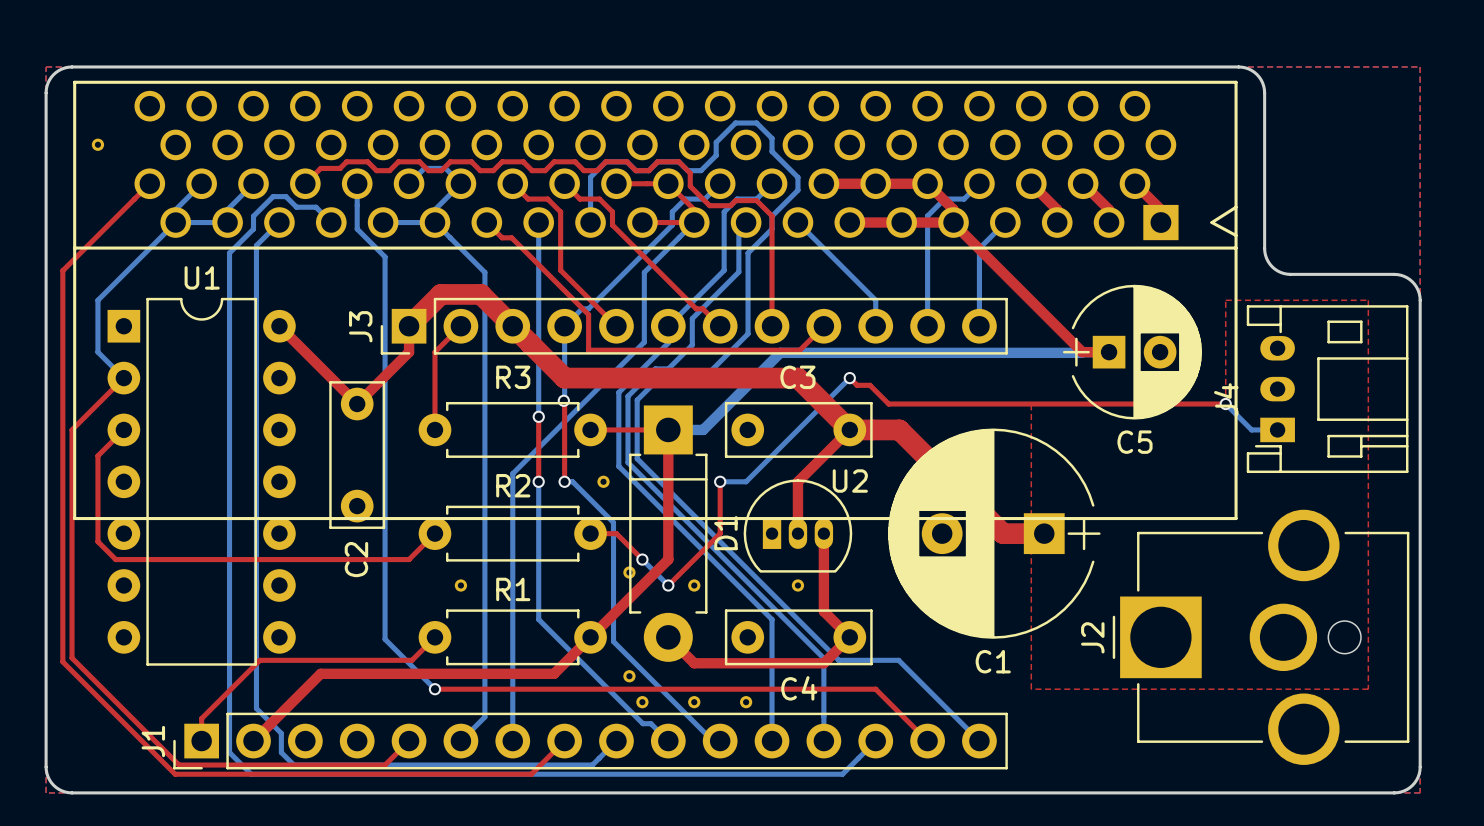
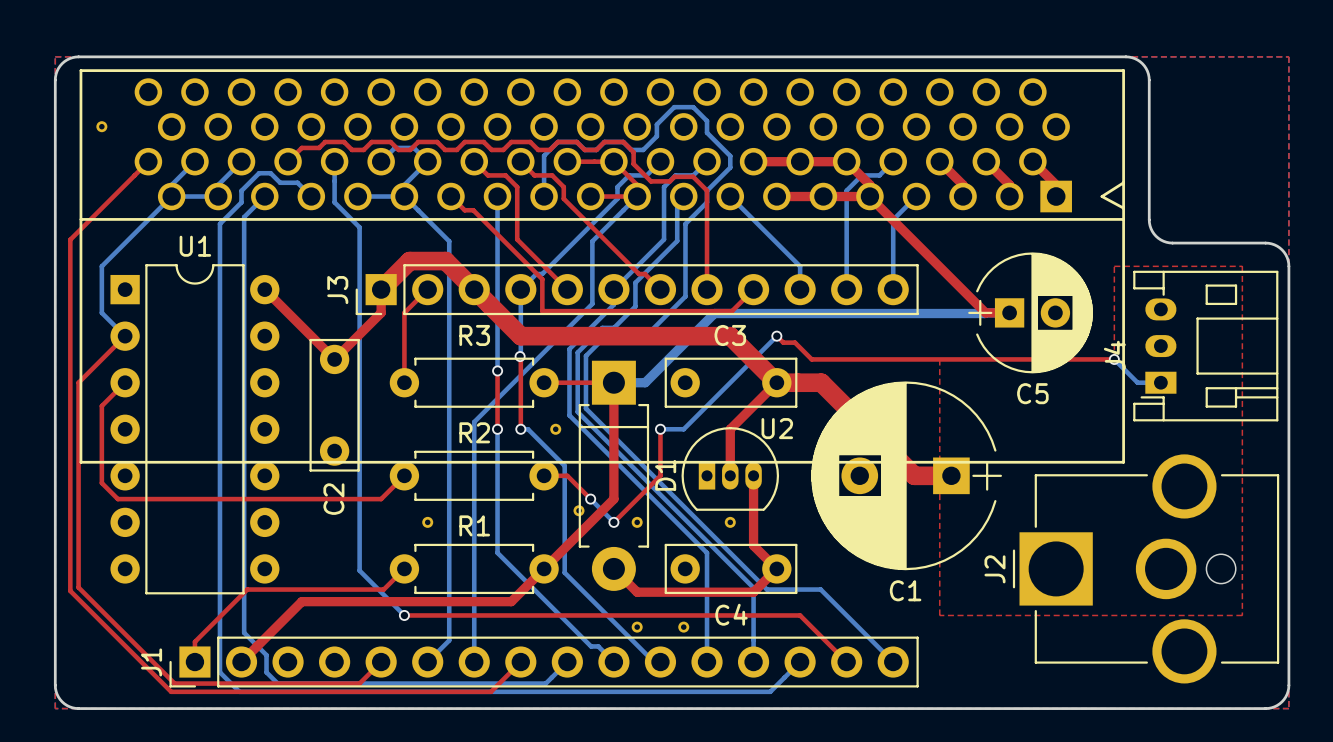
part: (629, 676) -> none
part: (642, 702) -> none

